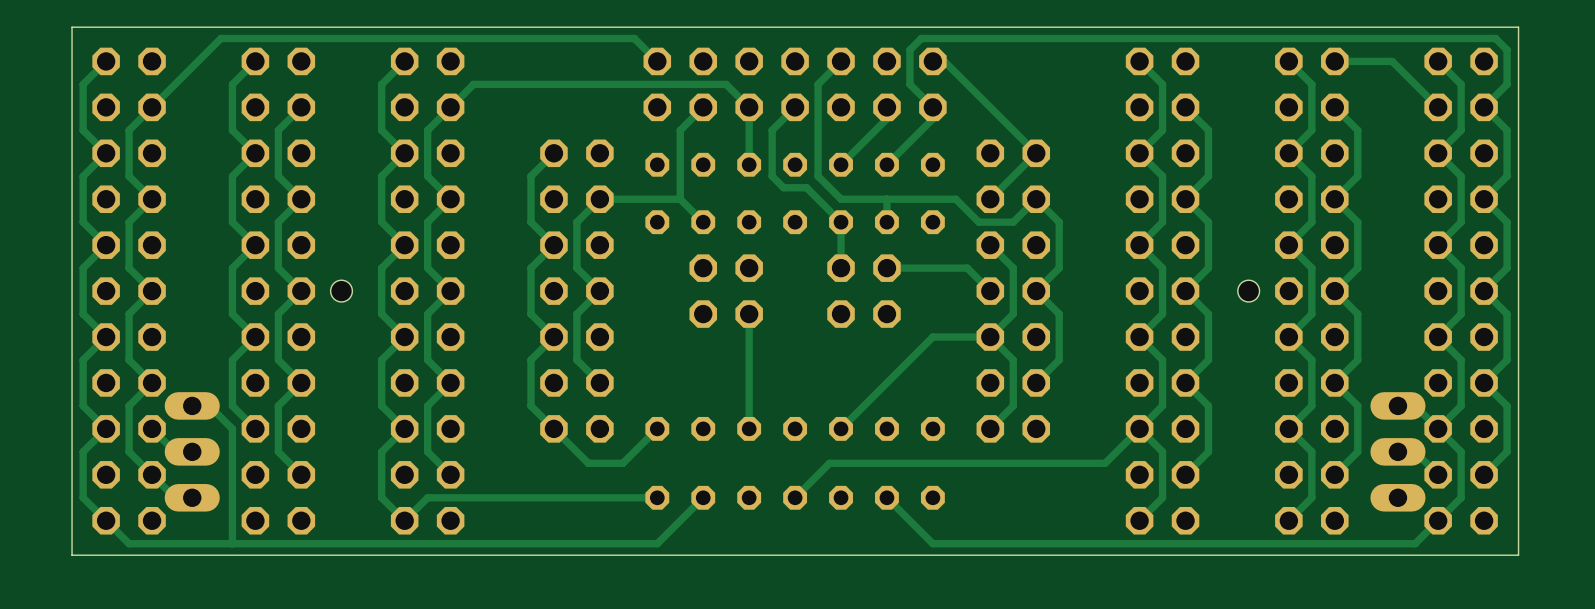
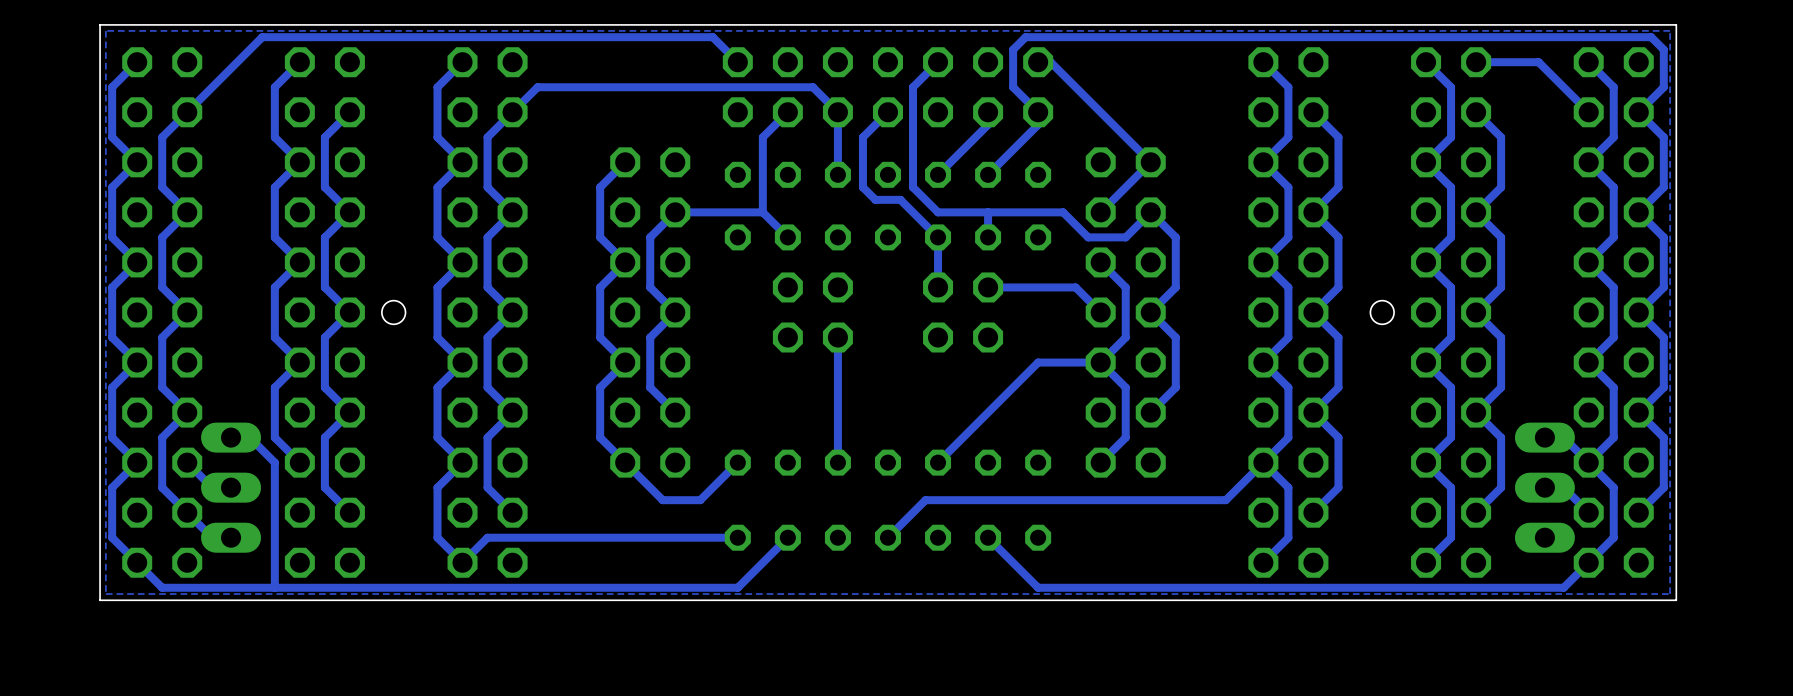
zone outline: none -> (1670, 30) (105, 30) (105, 594) (1670, 594) (1670, 30)

